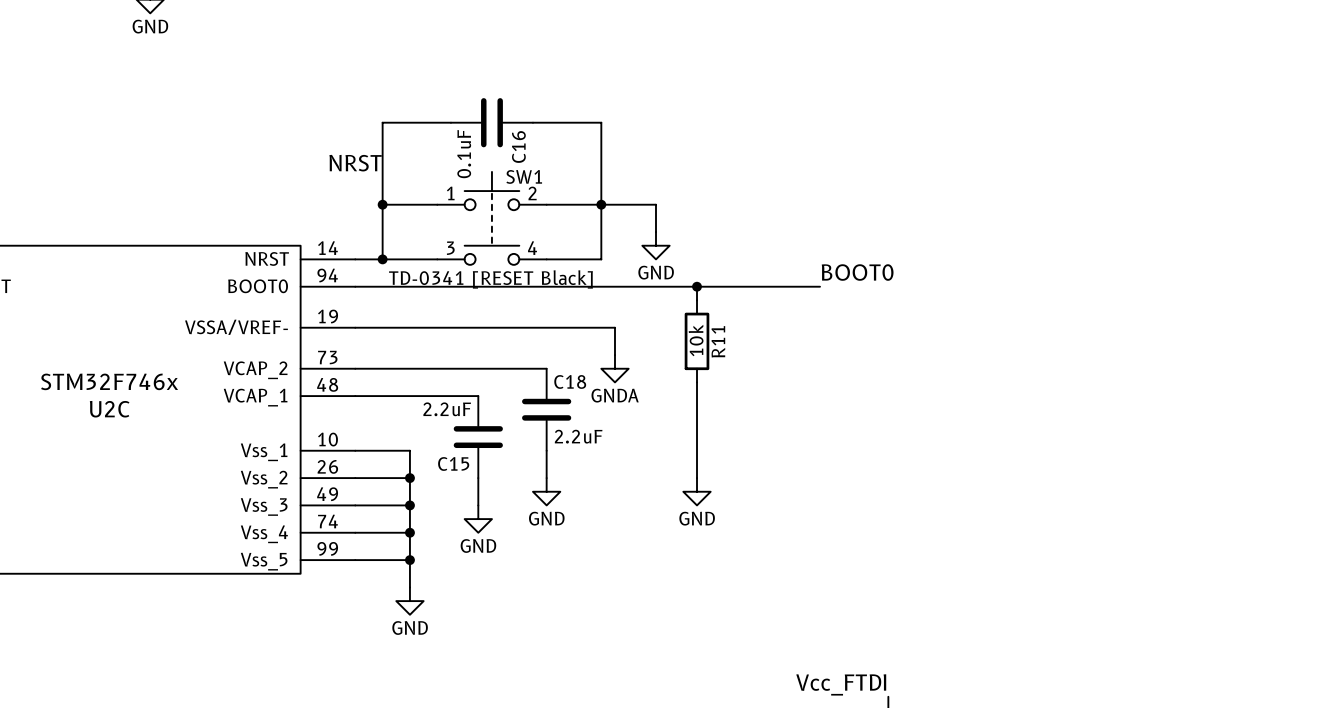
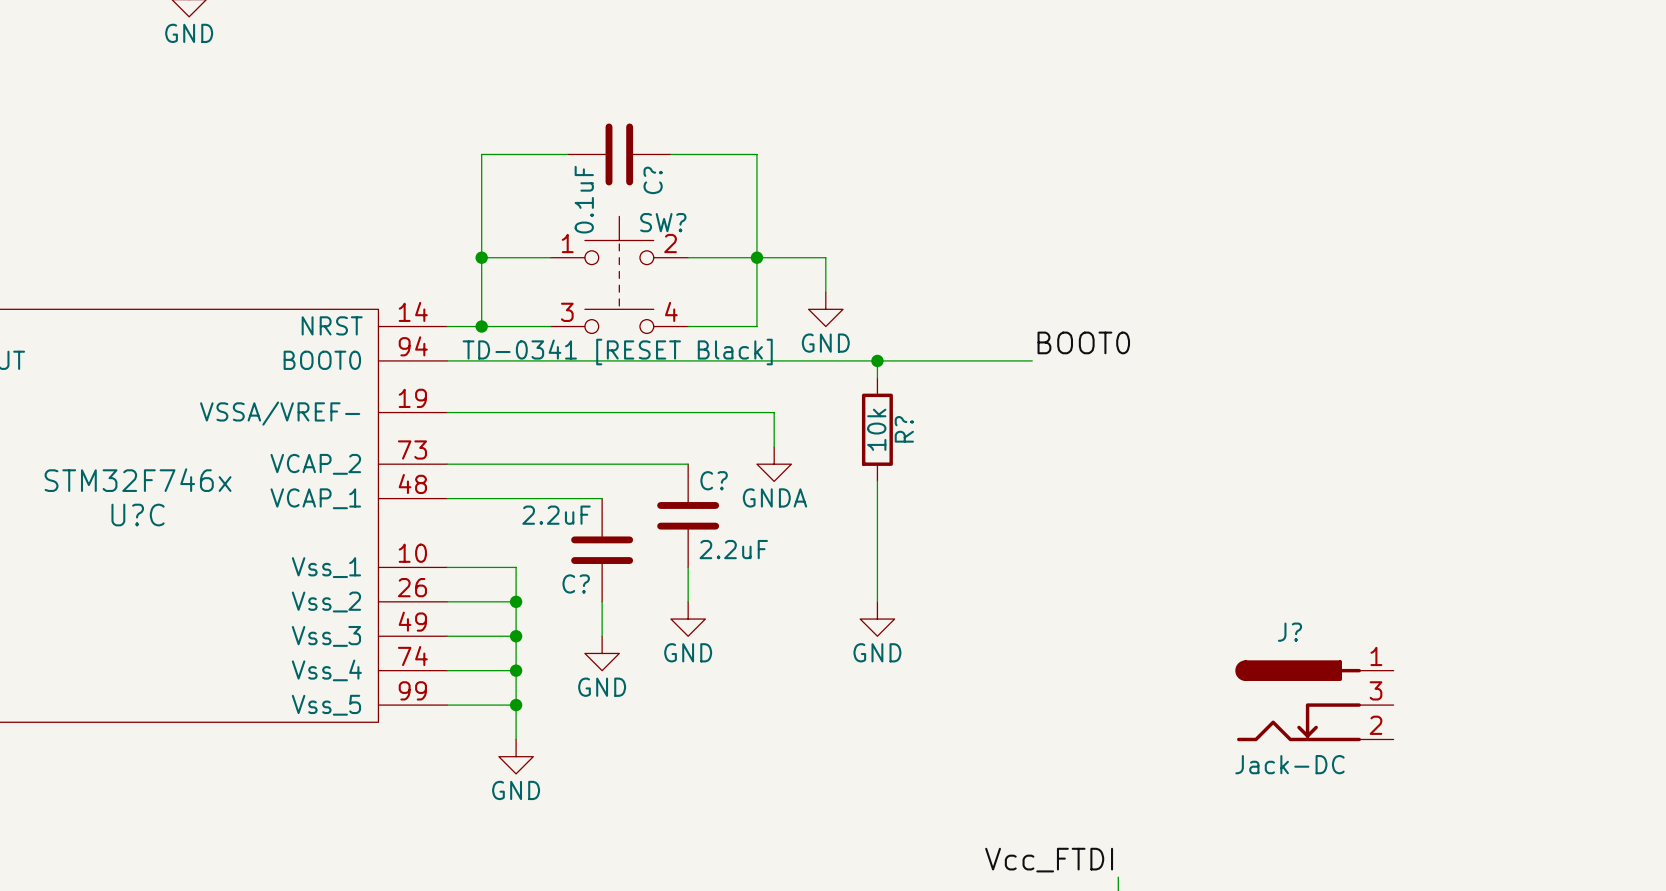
C16 name: C16 (518, 147) -> C? (653, 180)
label: NRST (355, 163) -> none
SW1 name: SW1 (524, 176) -> SW? (663, 222)
R11 name: R11 (718, 341) -> R? (904, 429)
C18 name: C18 (570, 381) -> C? (714, 480)
U2C name: U2C (109, 409) -> U?C (138, 515)
C15 name: C15 (453, 463) -> C? (576, 583)
J?: none -> Jack-DC (1314, 700)

